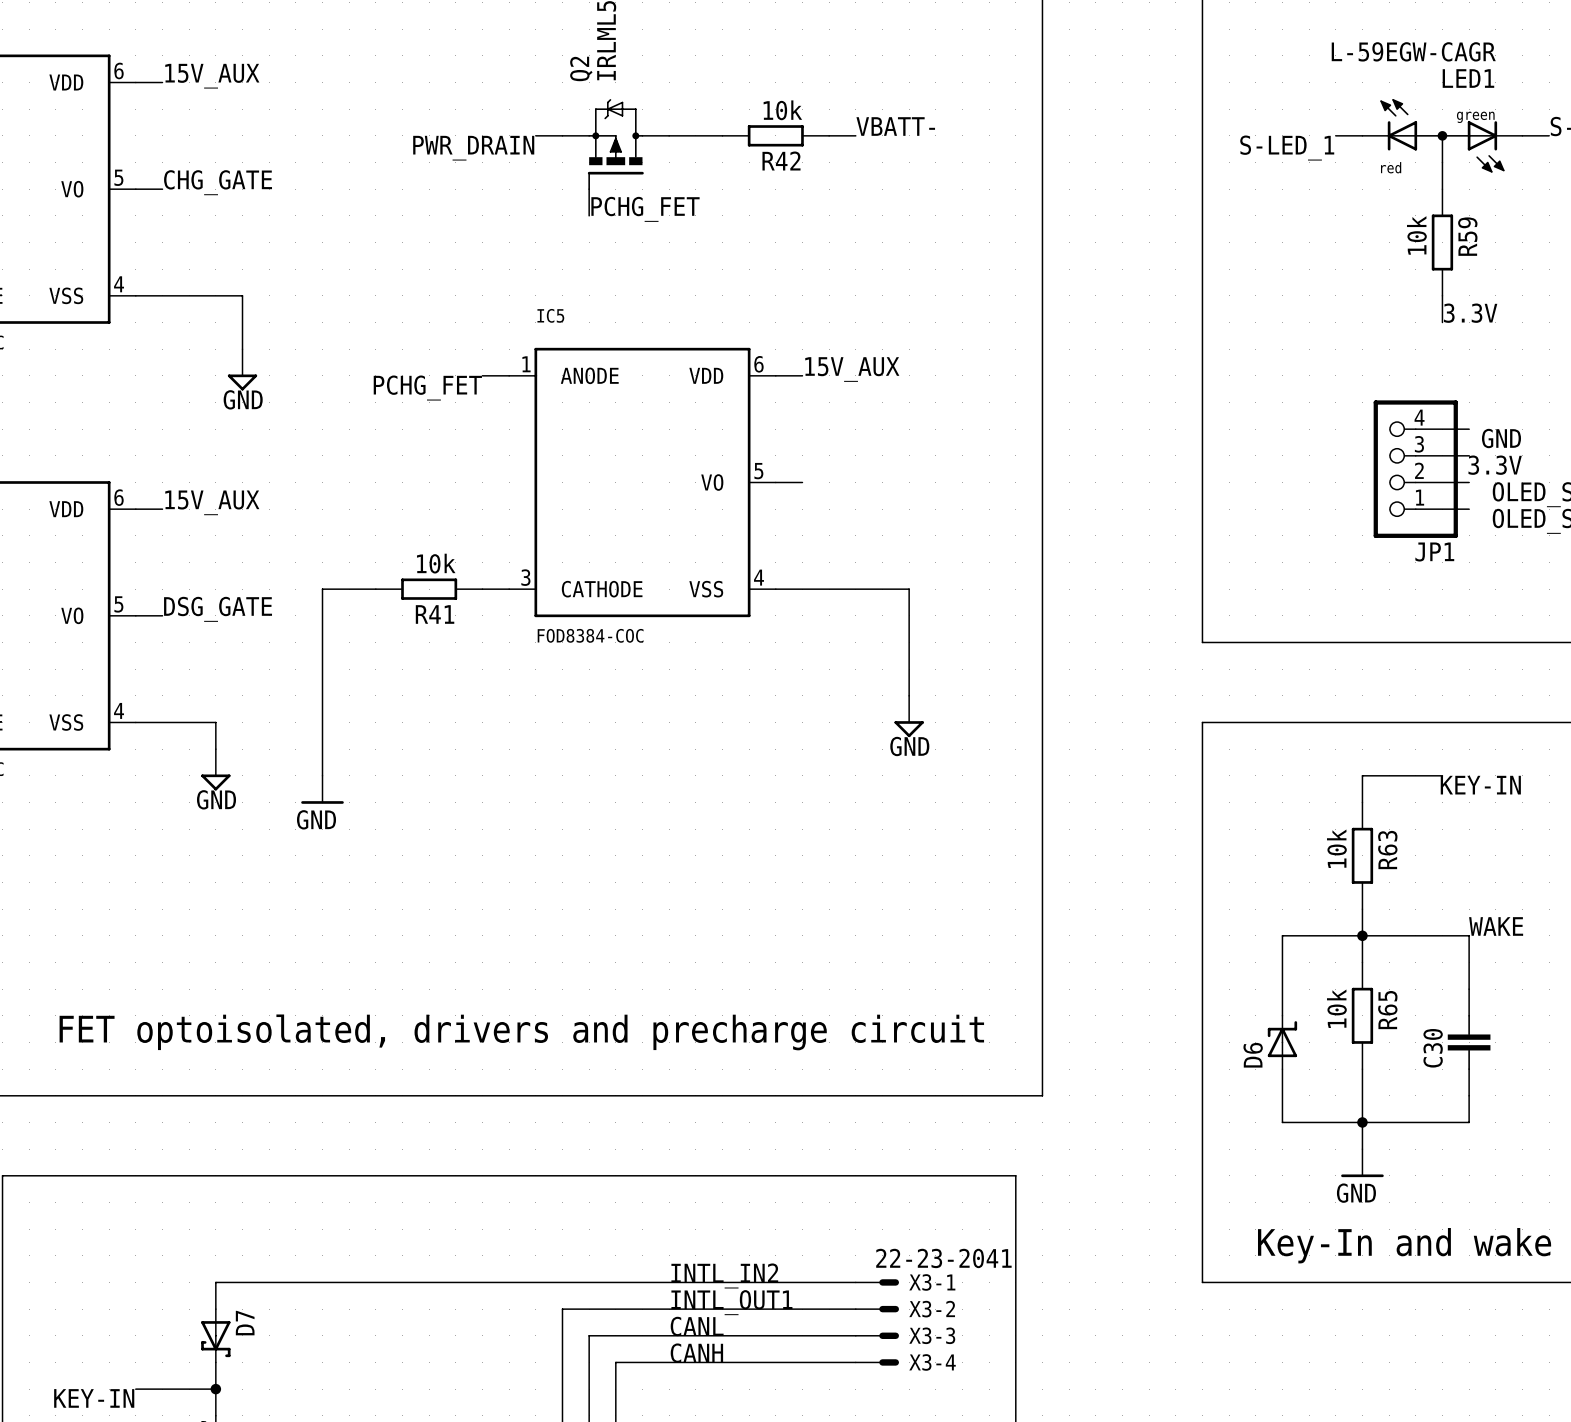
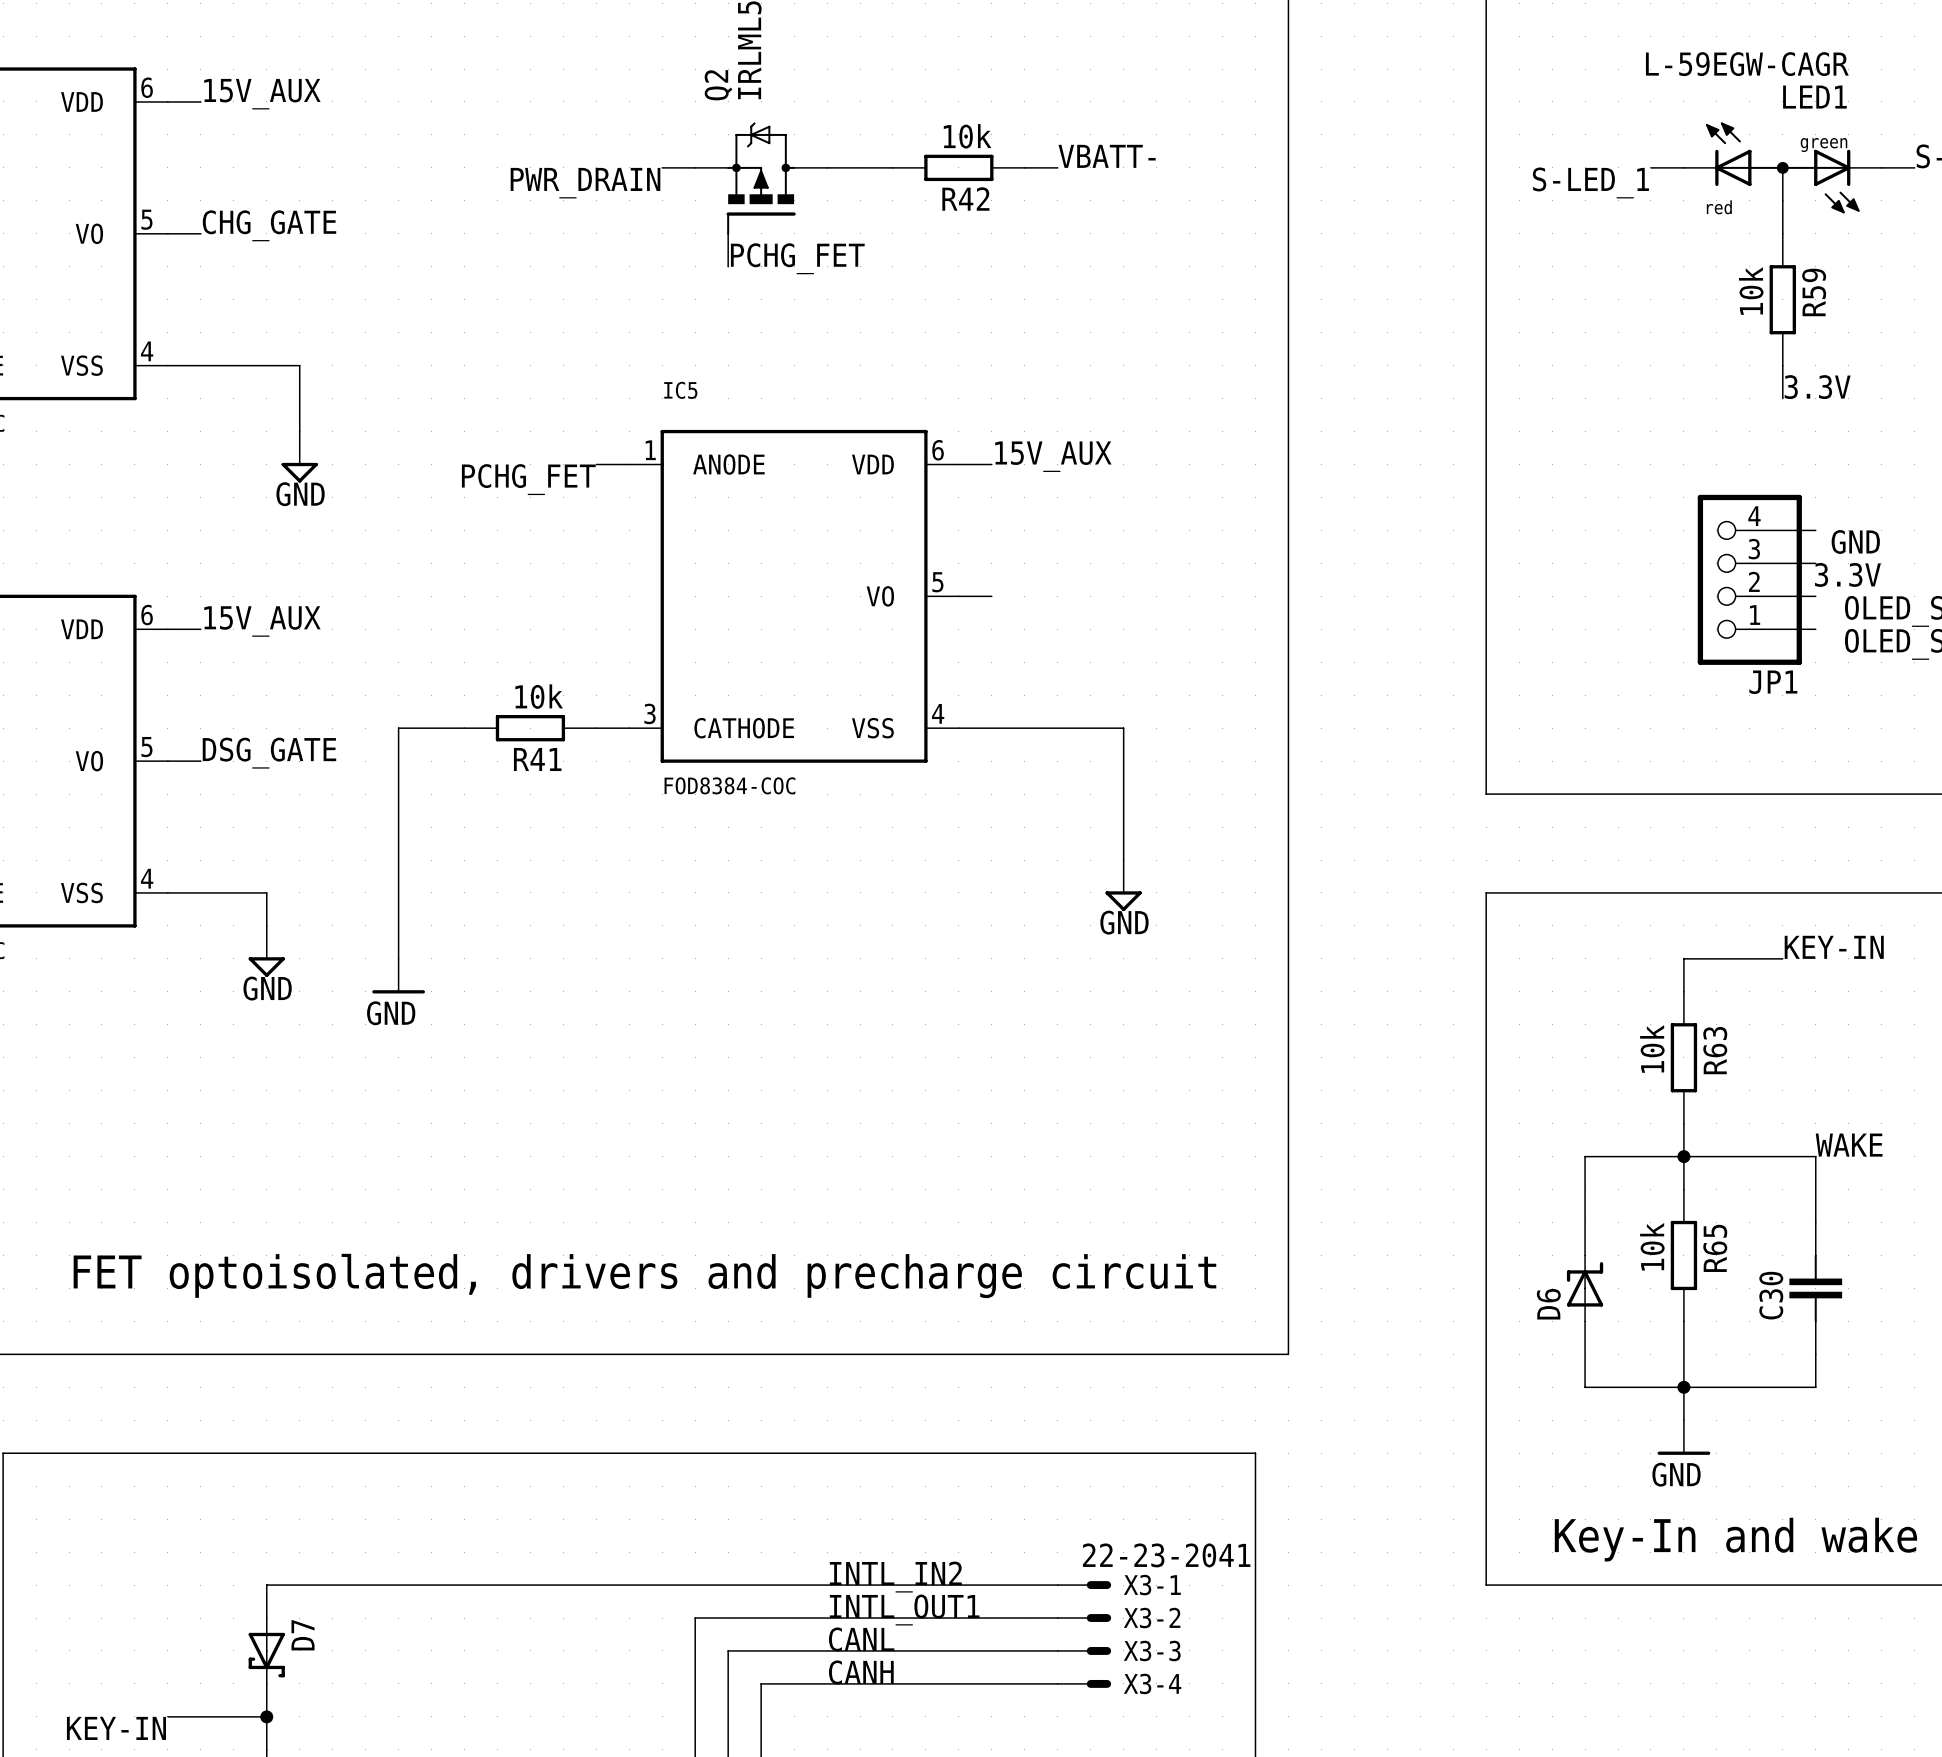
label position: KEY-IN (1480, 785) -> KEY-IN (1834, 947)

